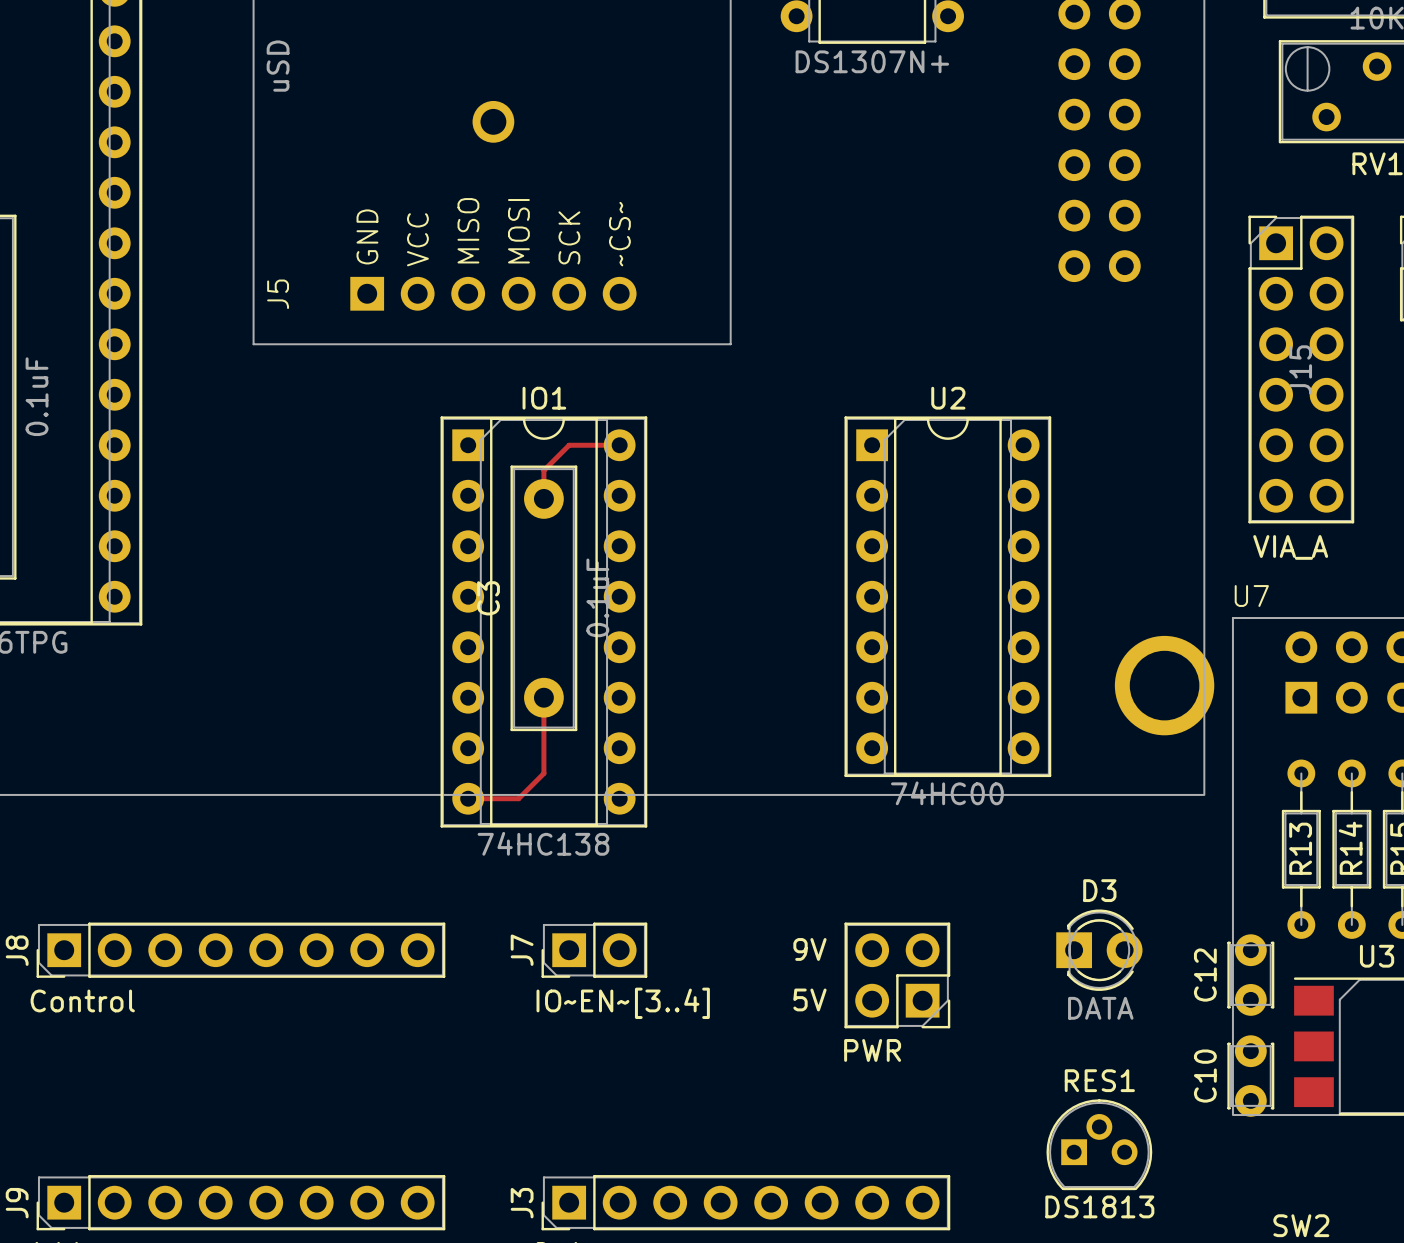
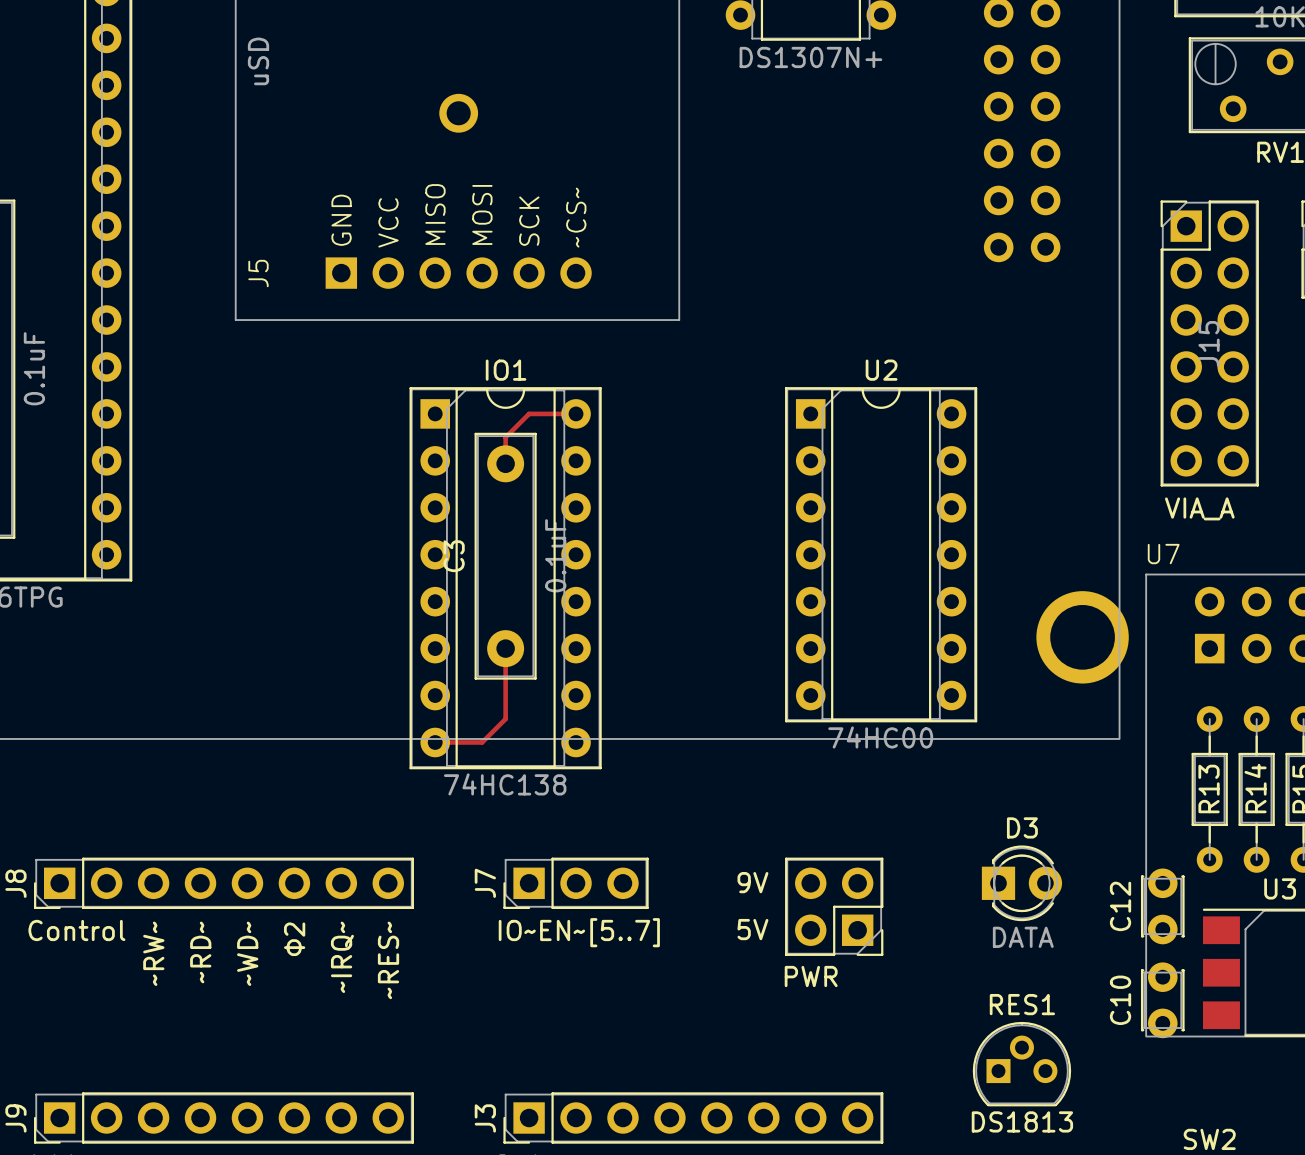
J7 footprint: [541, 922, 648, 978] -> [503, 857, 649, 909]
text: IO~EN~[3..4] (623, 1003) -> IO~EN~[5..7] (579, 932)
text: none -> Ф2 (294, 939)
text: none -> ~RD~ (200, 952)
text: none -> ~RW~ (153, 953)
text: none -> ~WD~ (247, 953)
text: none -> ~IRQ~ (342, 957)
text: none -> ~RES~ (388, 960)

